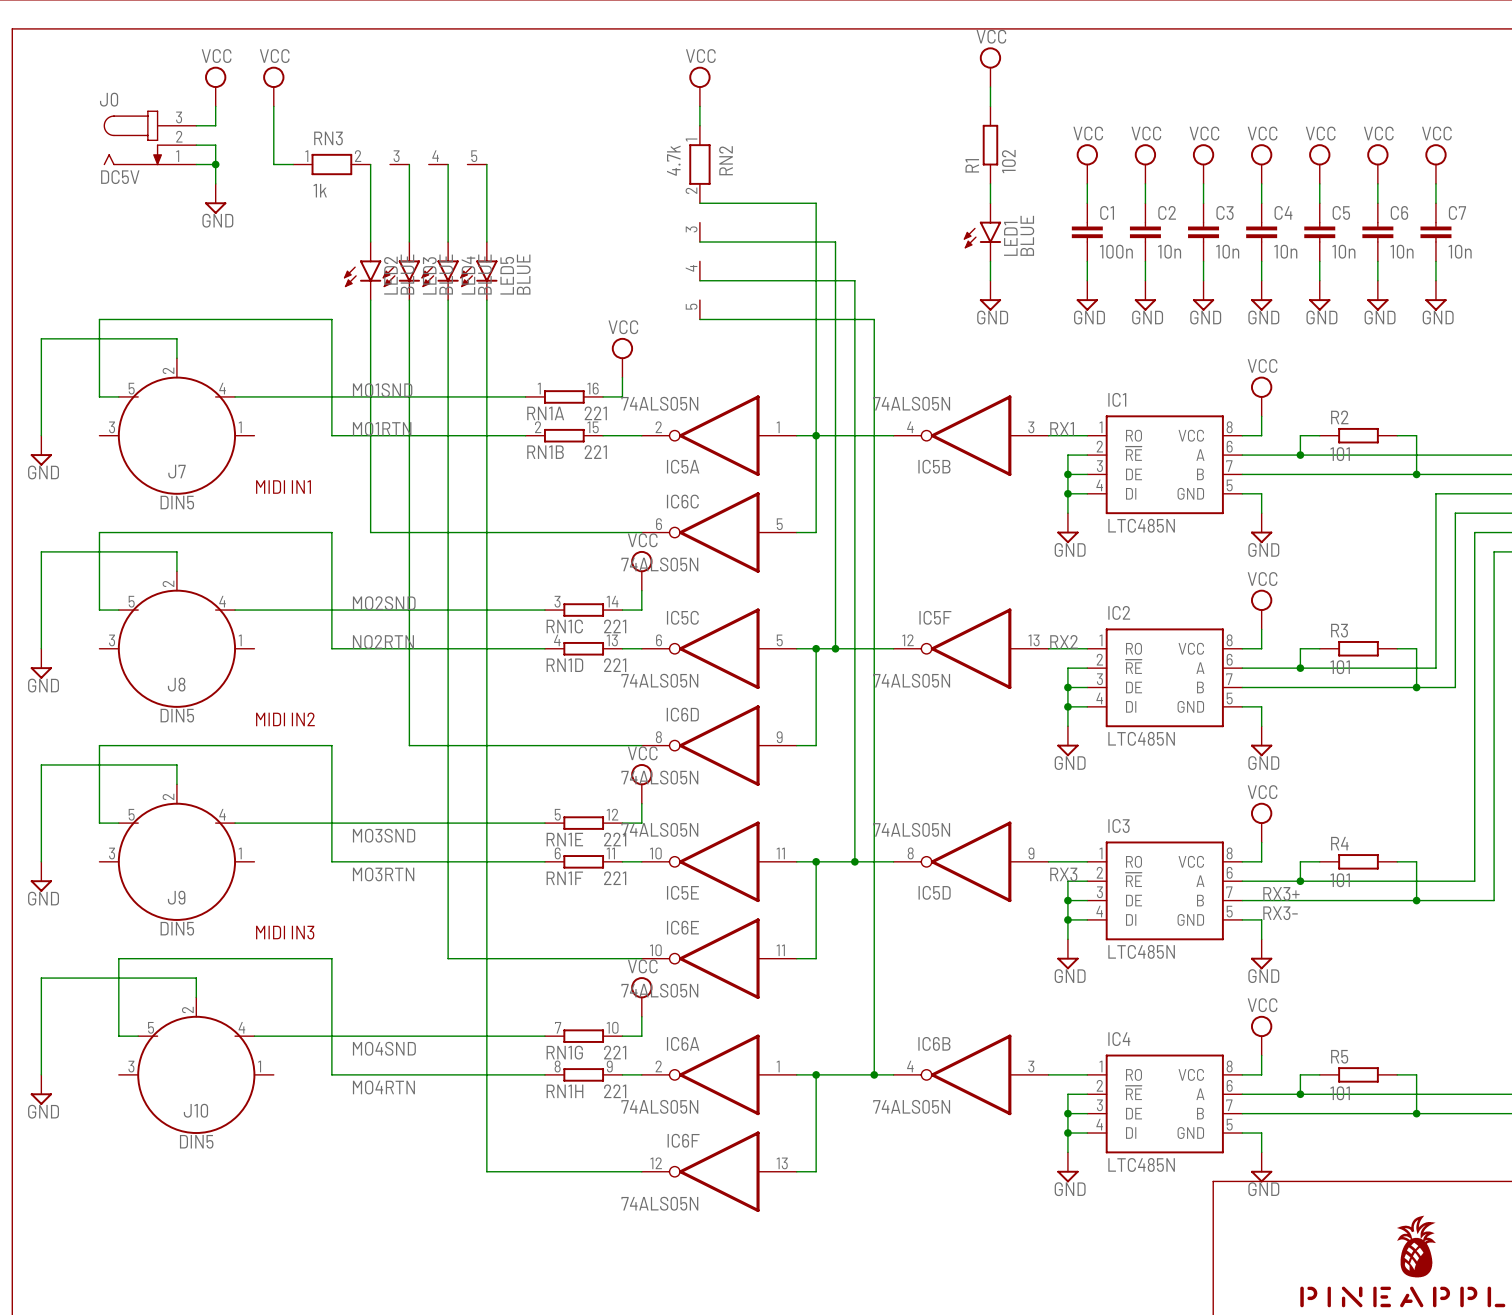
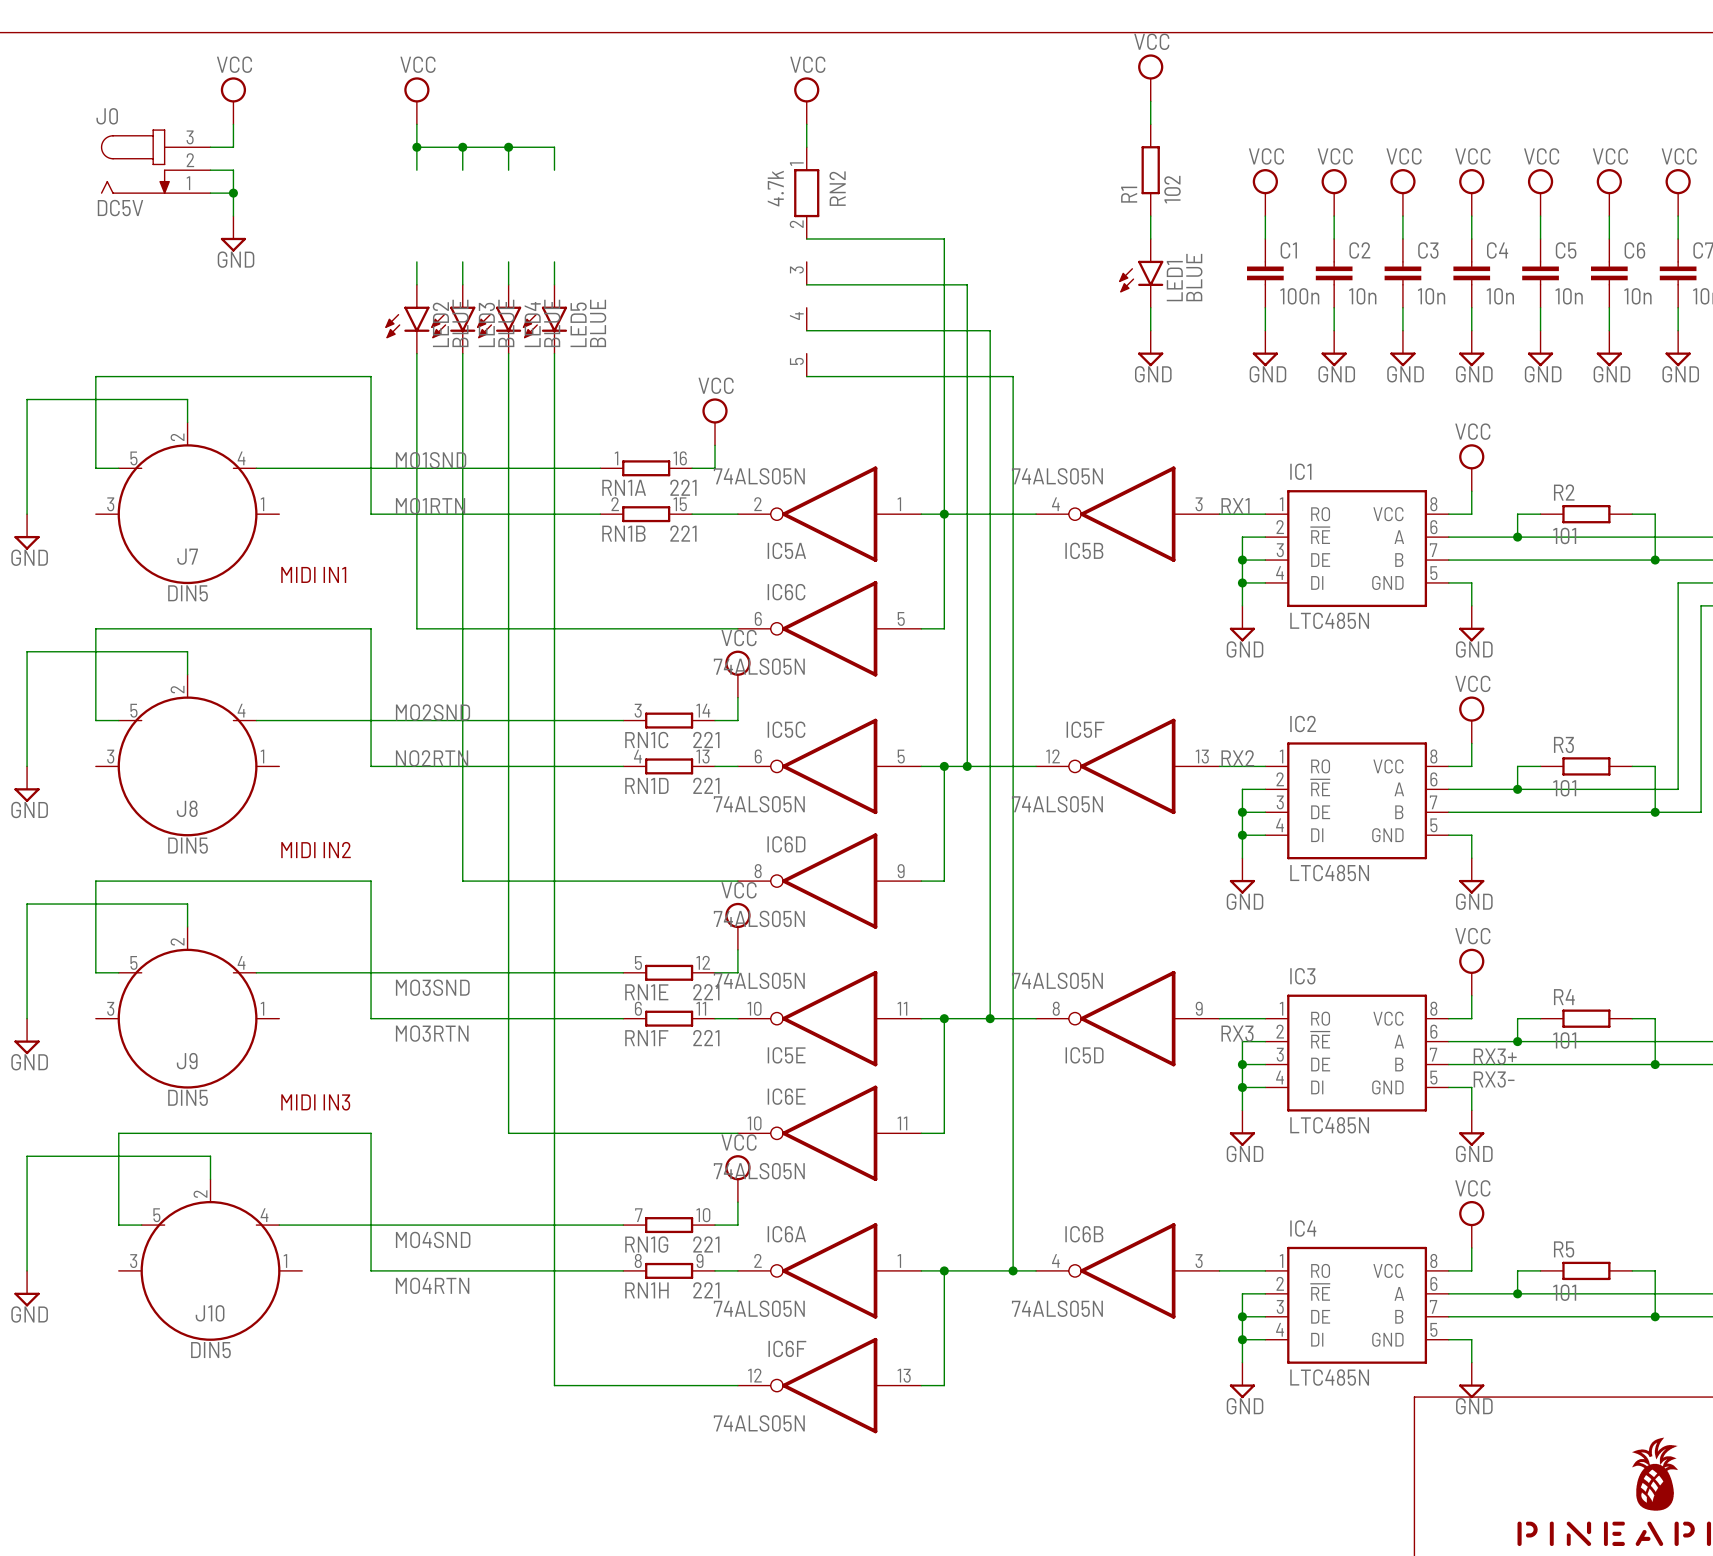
power symbol position: VCC (273, 86) -> VCC (416, 100)
wire: (273, 106) (273, 164) (293, 164) -> none
wire: none -> (416, 124) (416, 170)
wire: none -> (416, 147) (554, 147) (554, 170)
junction: none -> (416, 147)
wire: none -> (462, 147) (462, 170)
junction: none -> (462, 147)
wire: none -> (508, 147) (508, 170)
junction: none -> (508, 147)
wire: (370, 164) (370, 222) -> none
RN3: 1k (390, 164) -> none
wire: (409, 164) (409, 222) -> none
wire: (448, 164) (448, 222) -> none
wire: (486, 164) (486, 222) -> none

